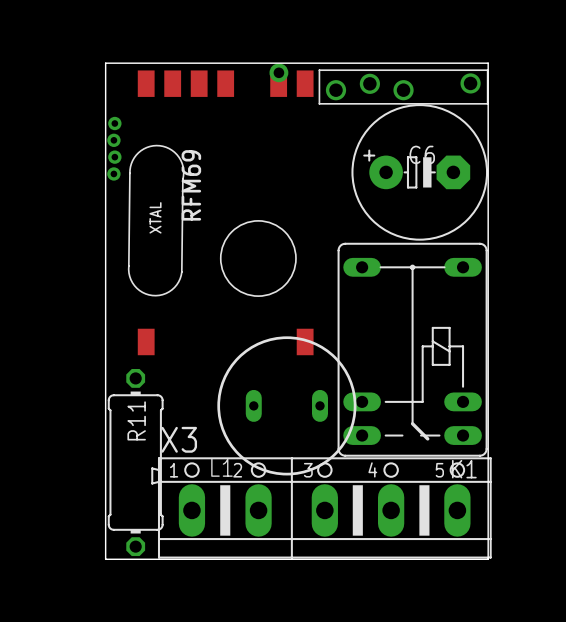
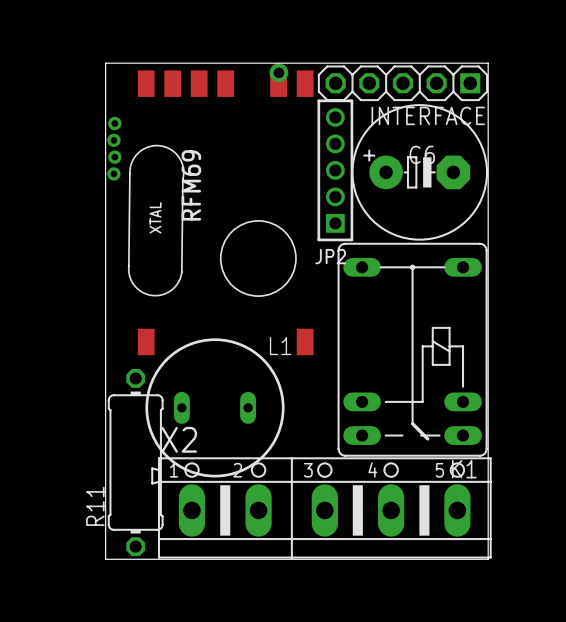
INTERFACE: none -> (402, 83)
part: (403, 87) -> none
JP2: none -> (335, 170)
L1 position: (286, 405) -> (214, 407)
R11 name position: R11 (136, 420) -> R11 (95, 506)
X3 name: X3 (179, 439) -> X2 (179, 439)
L1 name position: L1 (221, 467) -> L1 (280, 346)

